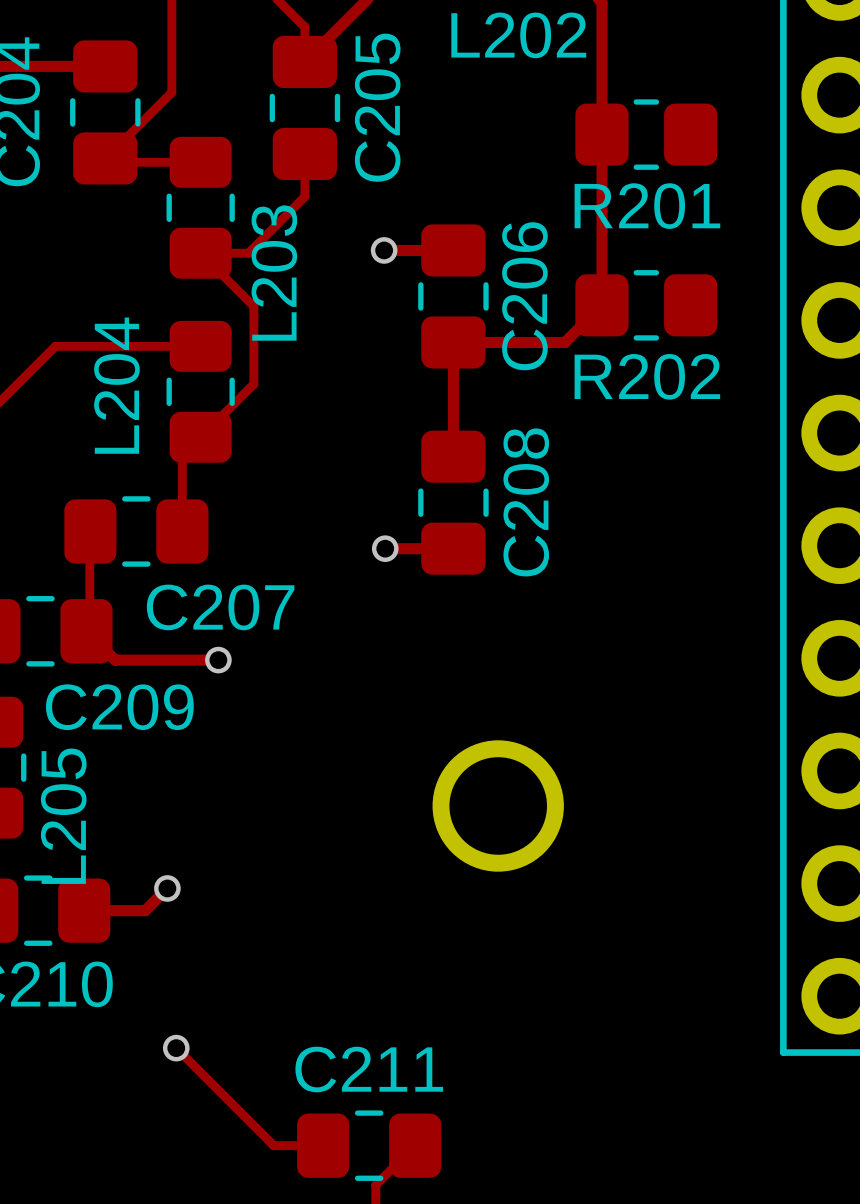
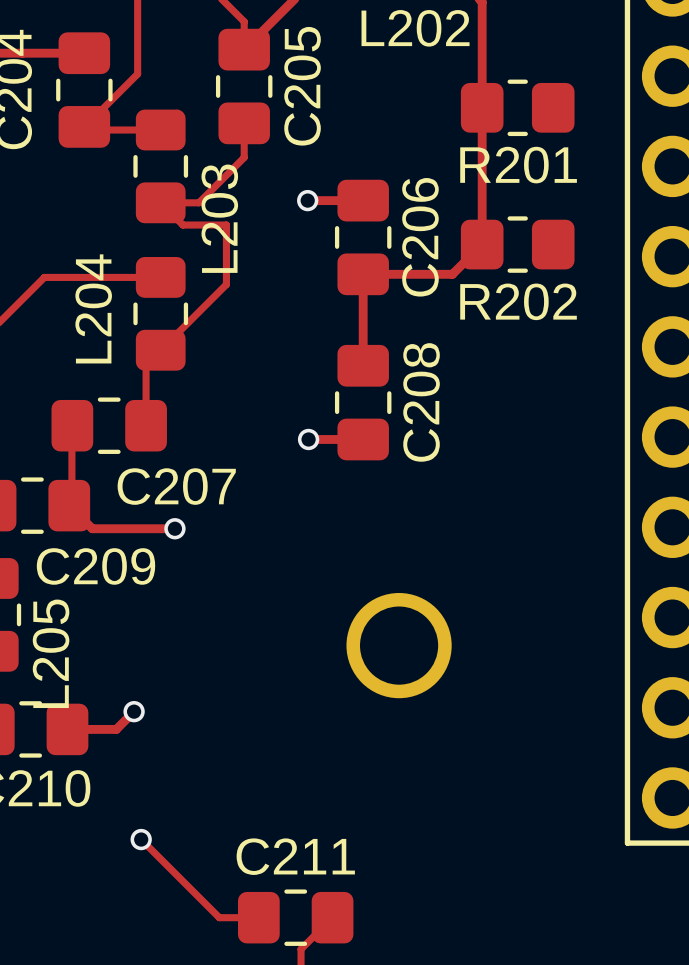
track: (228, 280) (253, 306) (253, 384) -> (182, 225) (226, 225) (226, 284) (203, 307)

